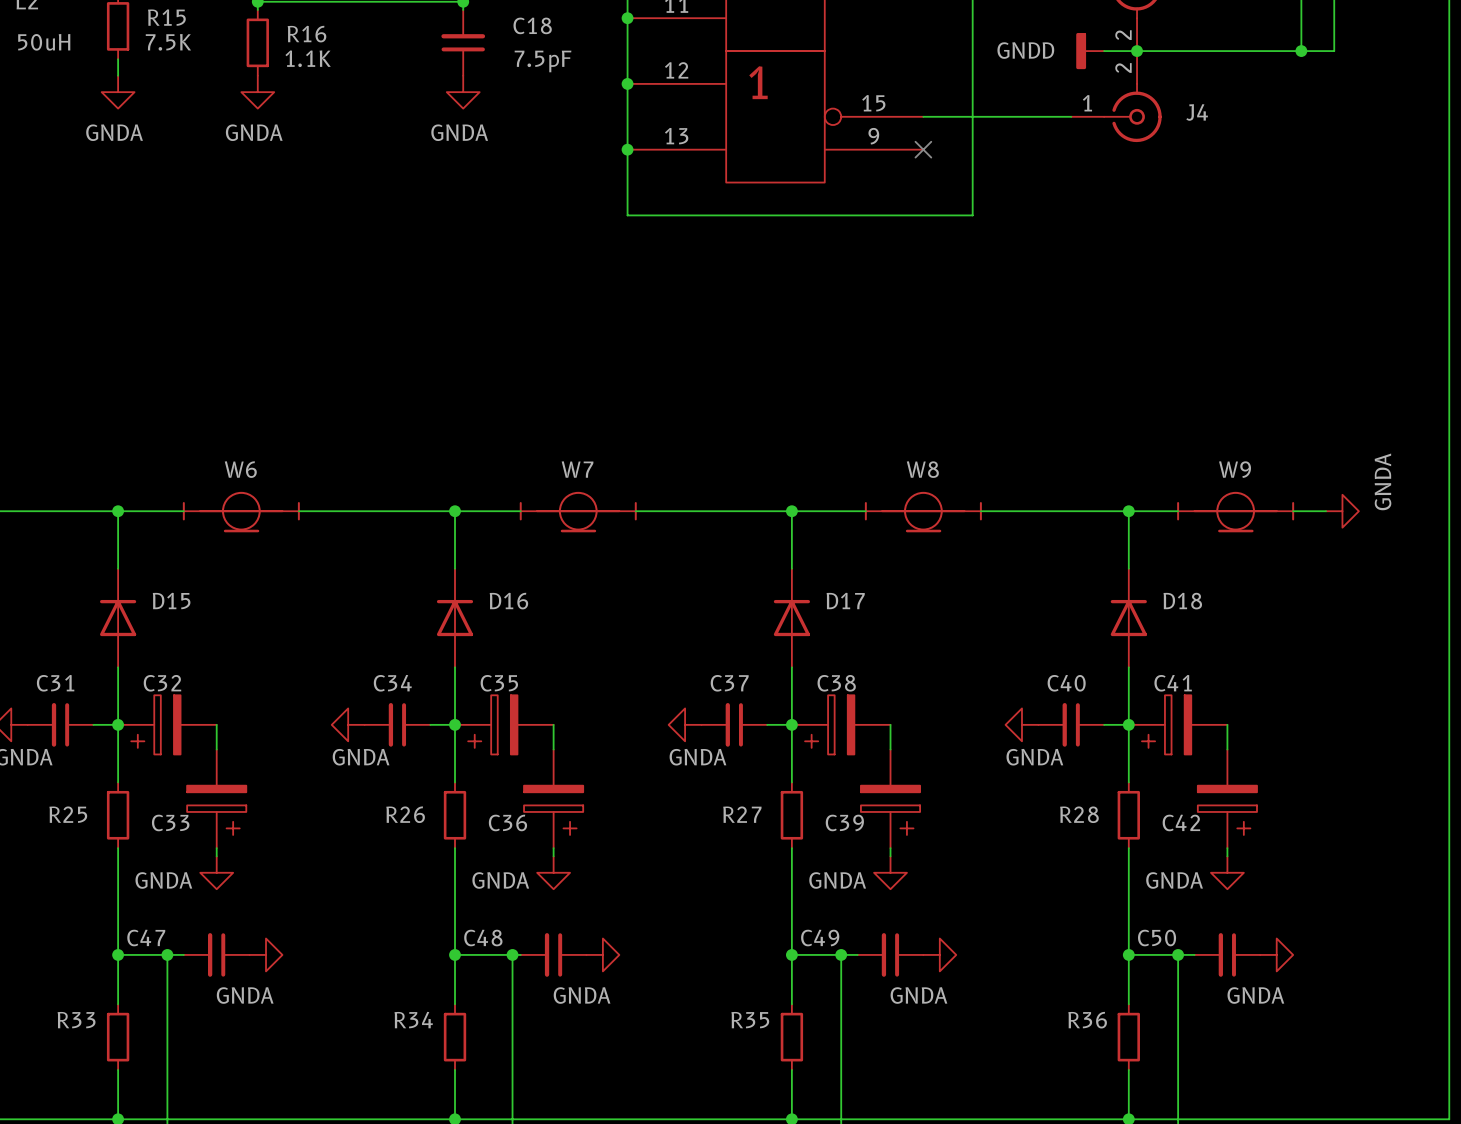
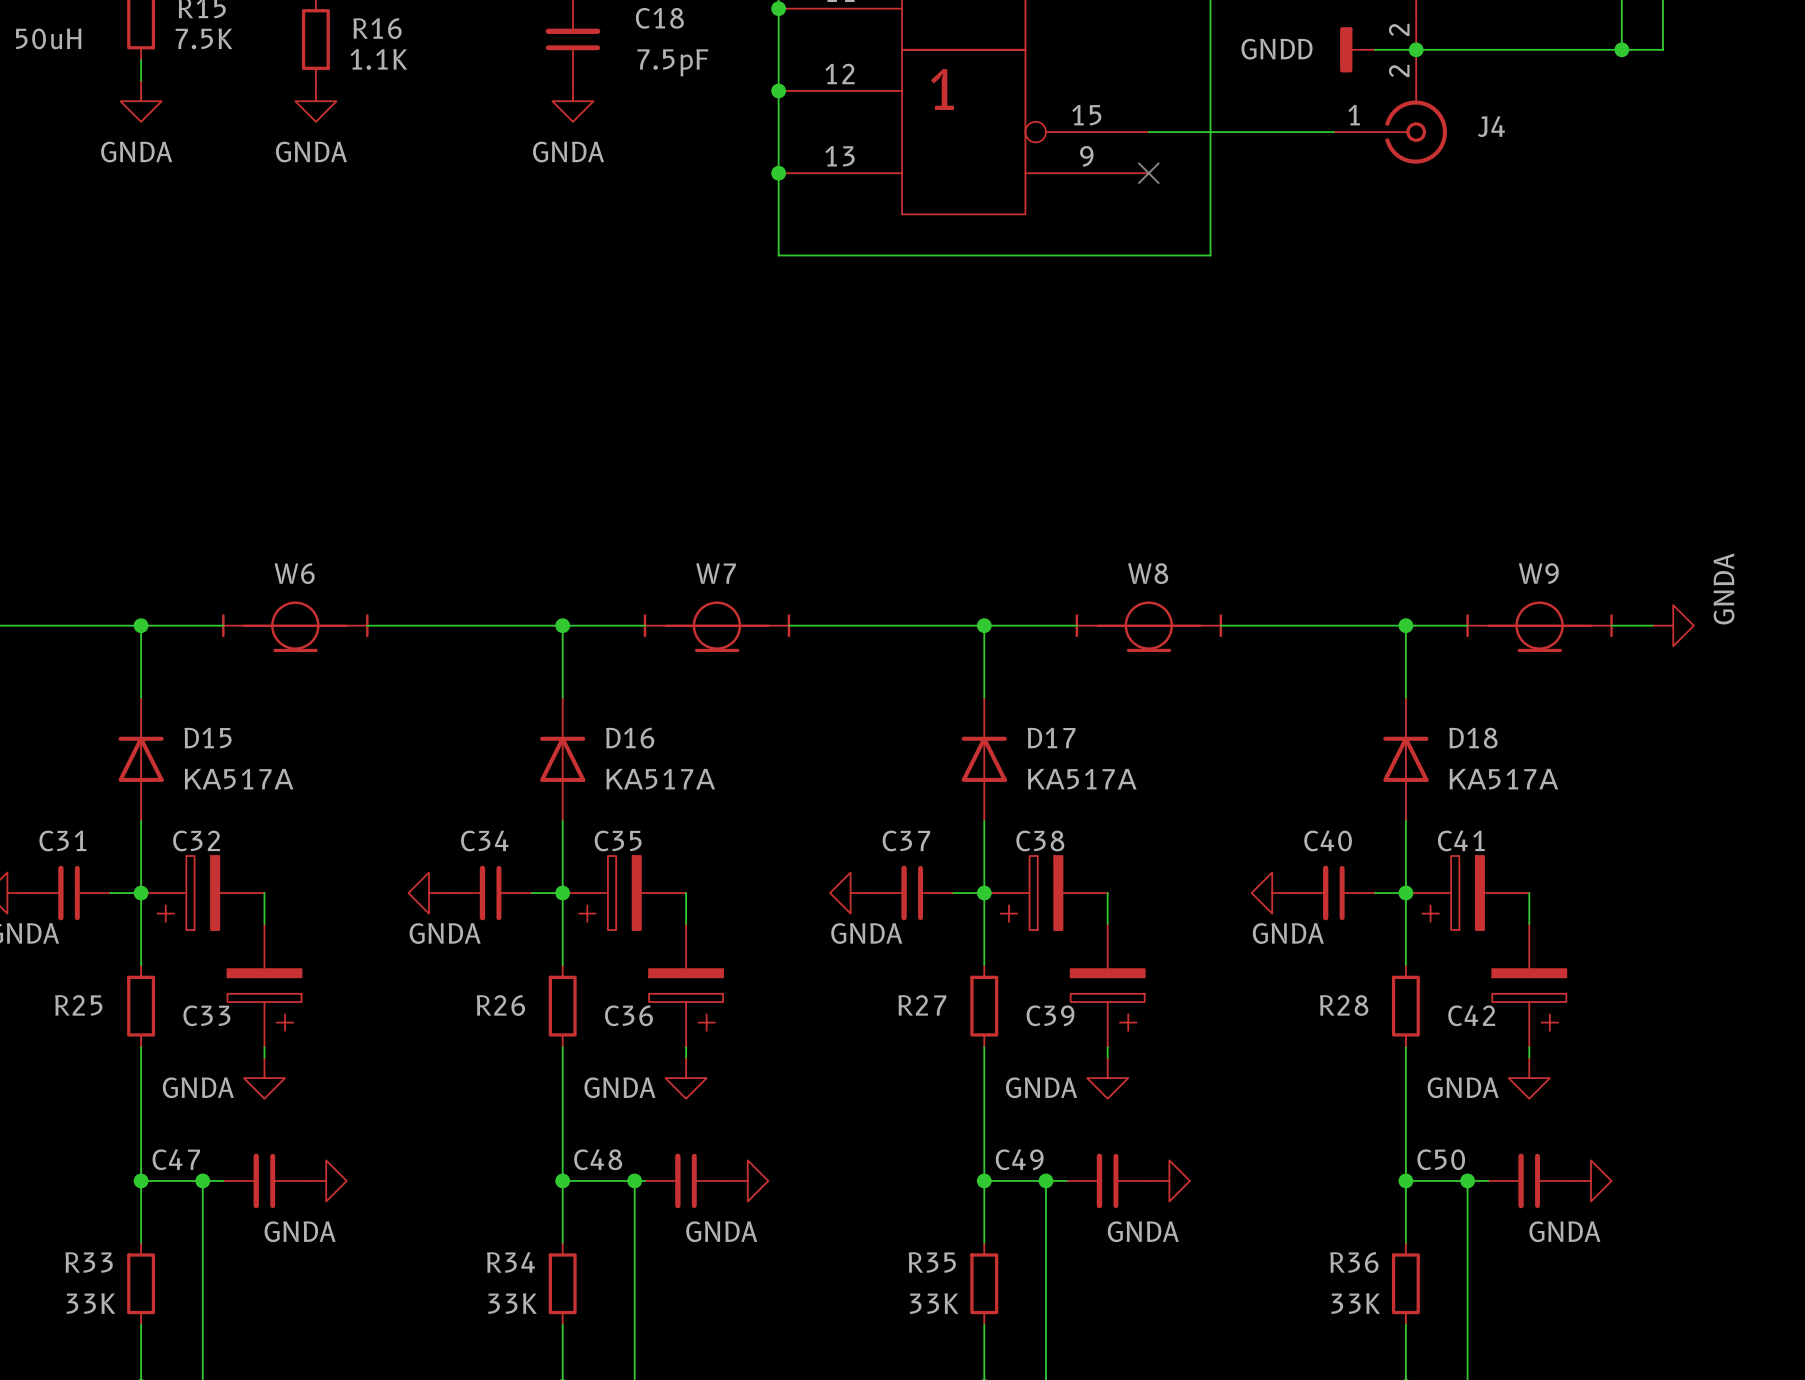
D15 value: none -> КА517А (239, 779)
D16 value: none -> КА517А (660, 779)
D17 value: none -> КА517А (1082, 779)
D18 value: none -> КА517А (1503, 779)
R33 value: none -> 33K (90, 1303)
R34 value: none -> 33K (512, 1303)
R35 value: none -> 33K (934, 1303)
R36 value: none -> 33K (1355, 1303)

